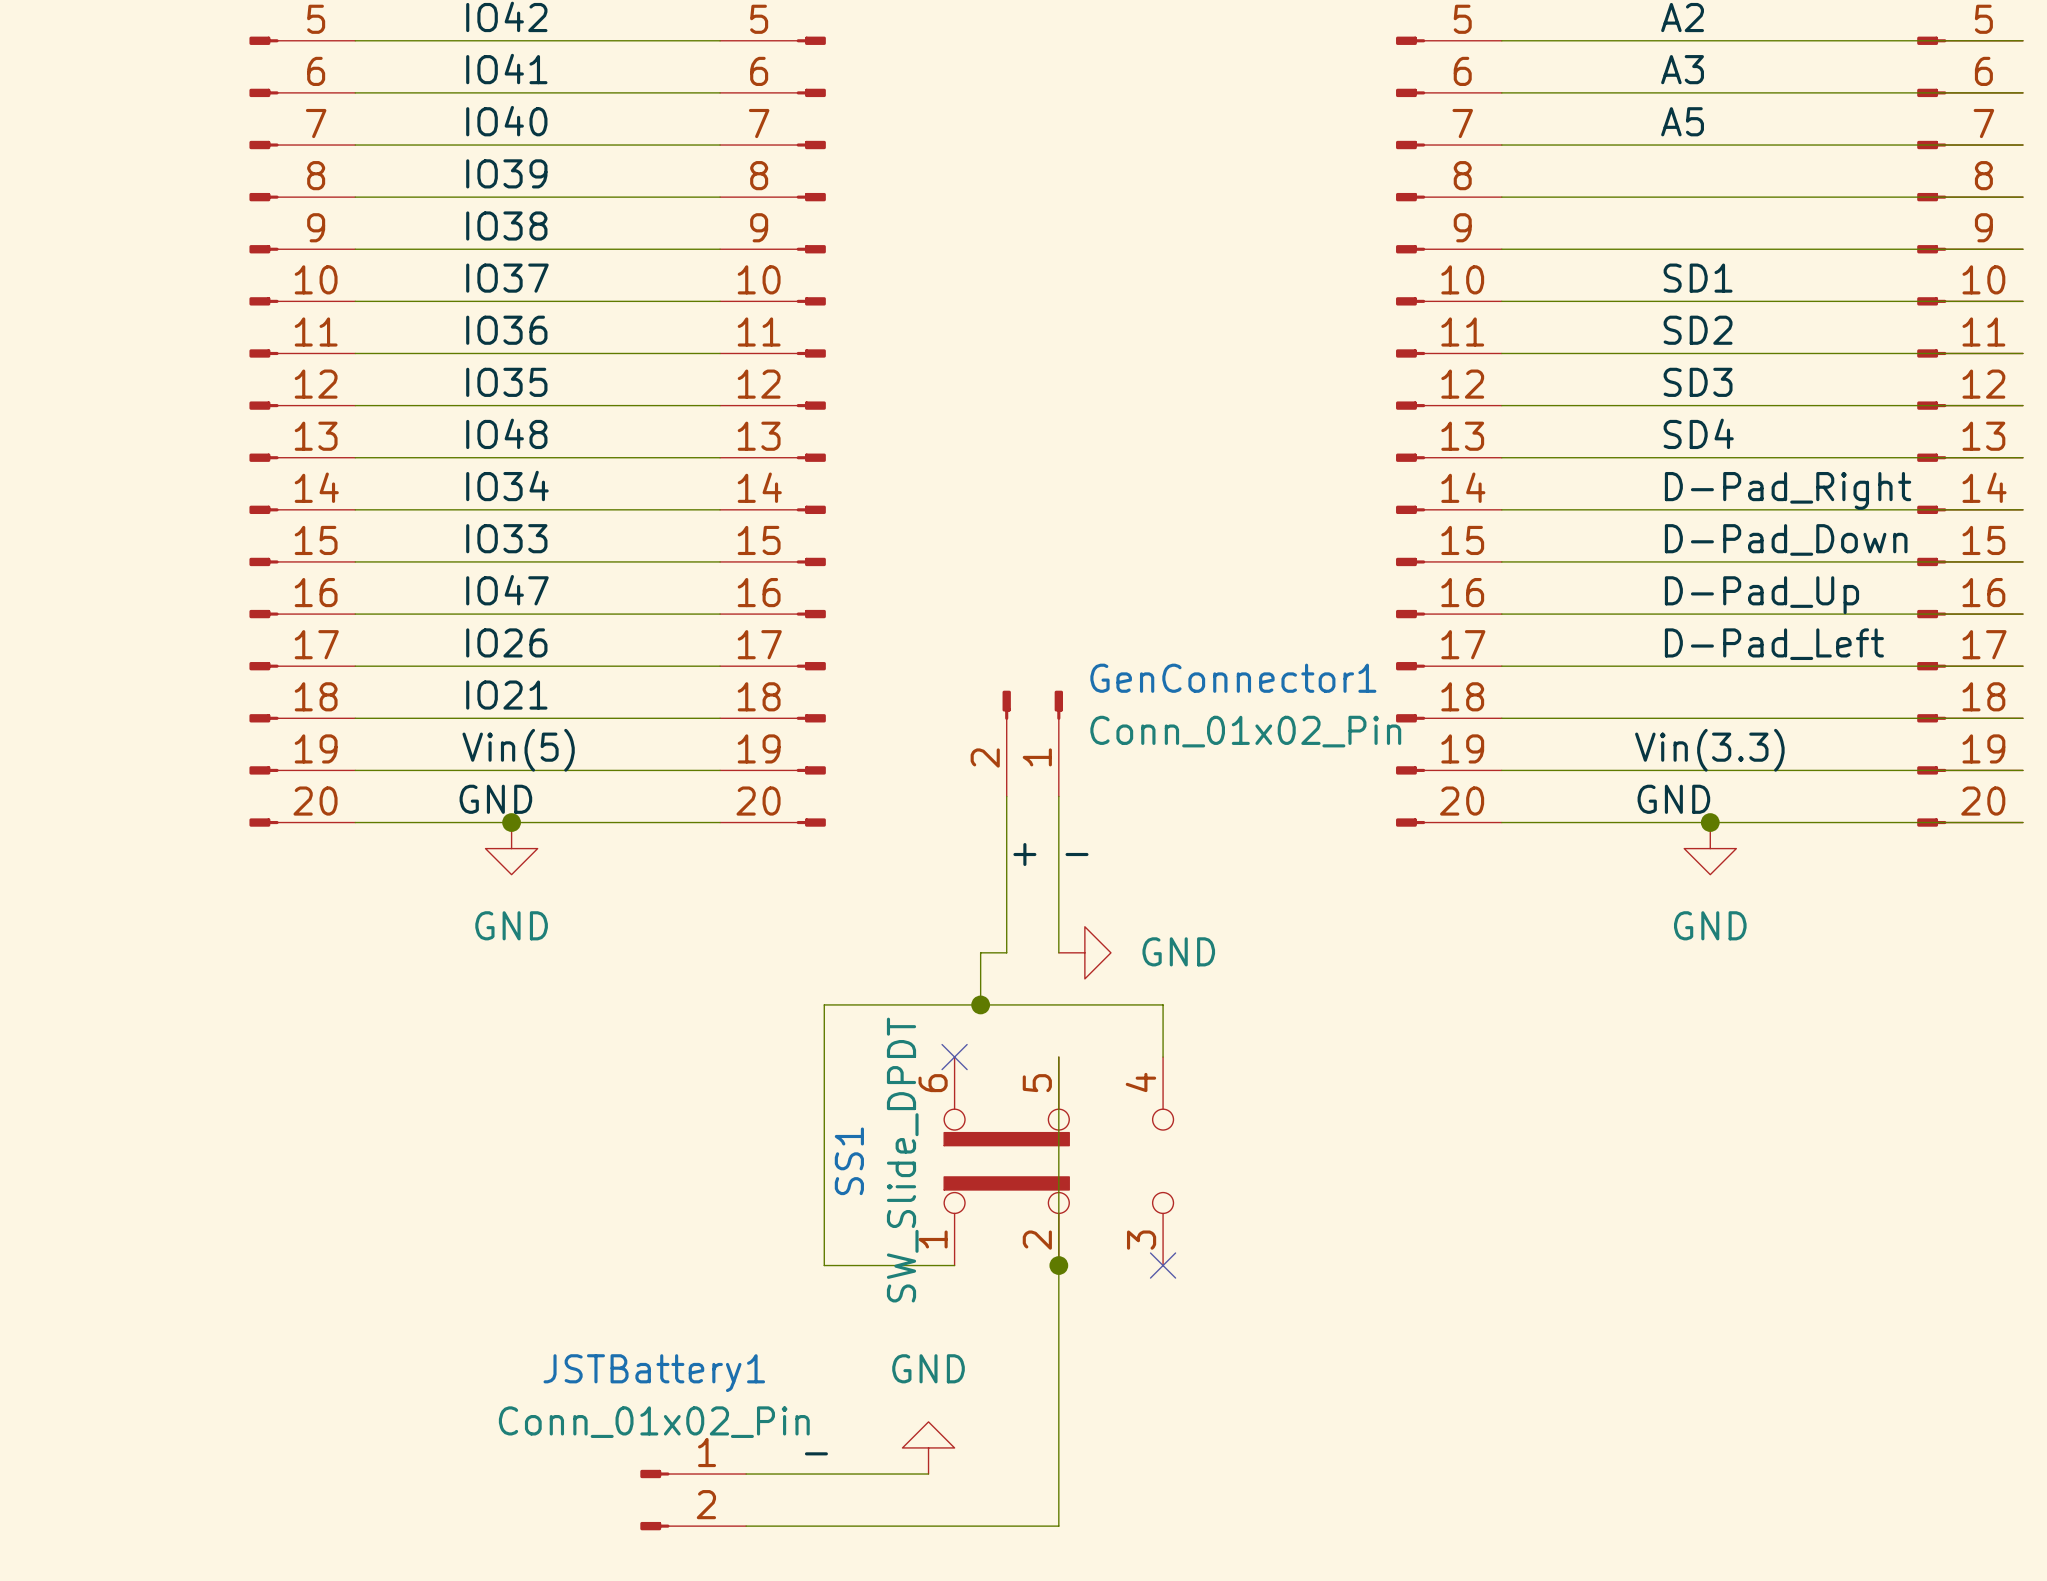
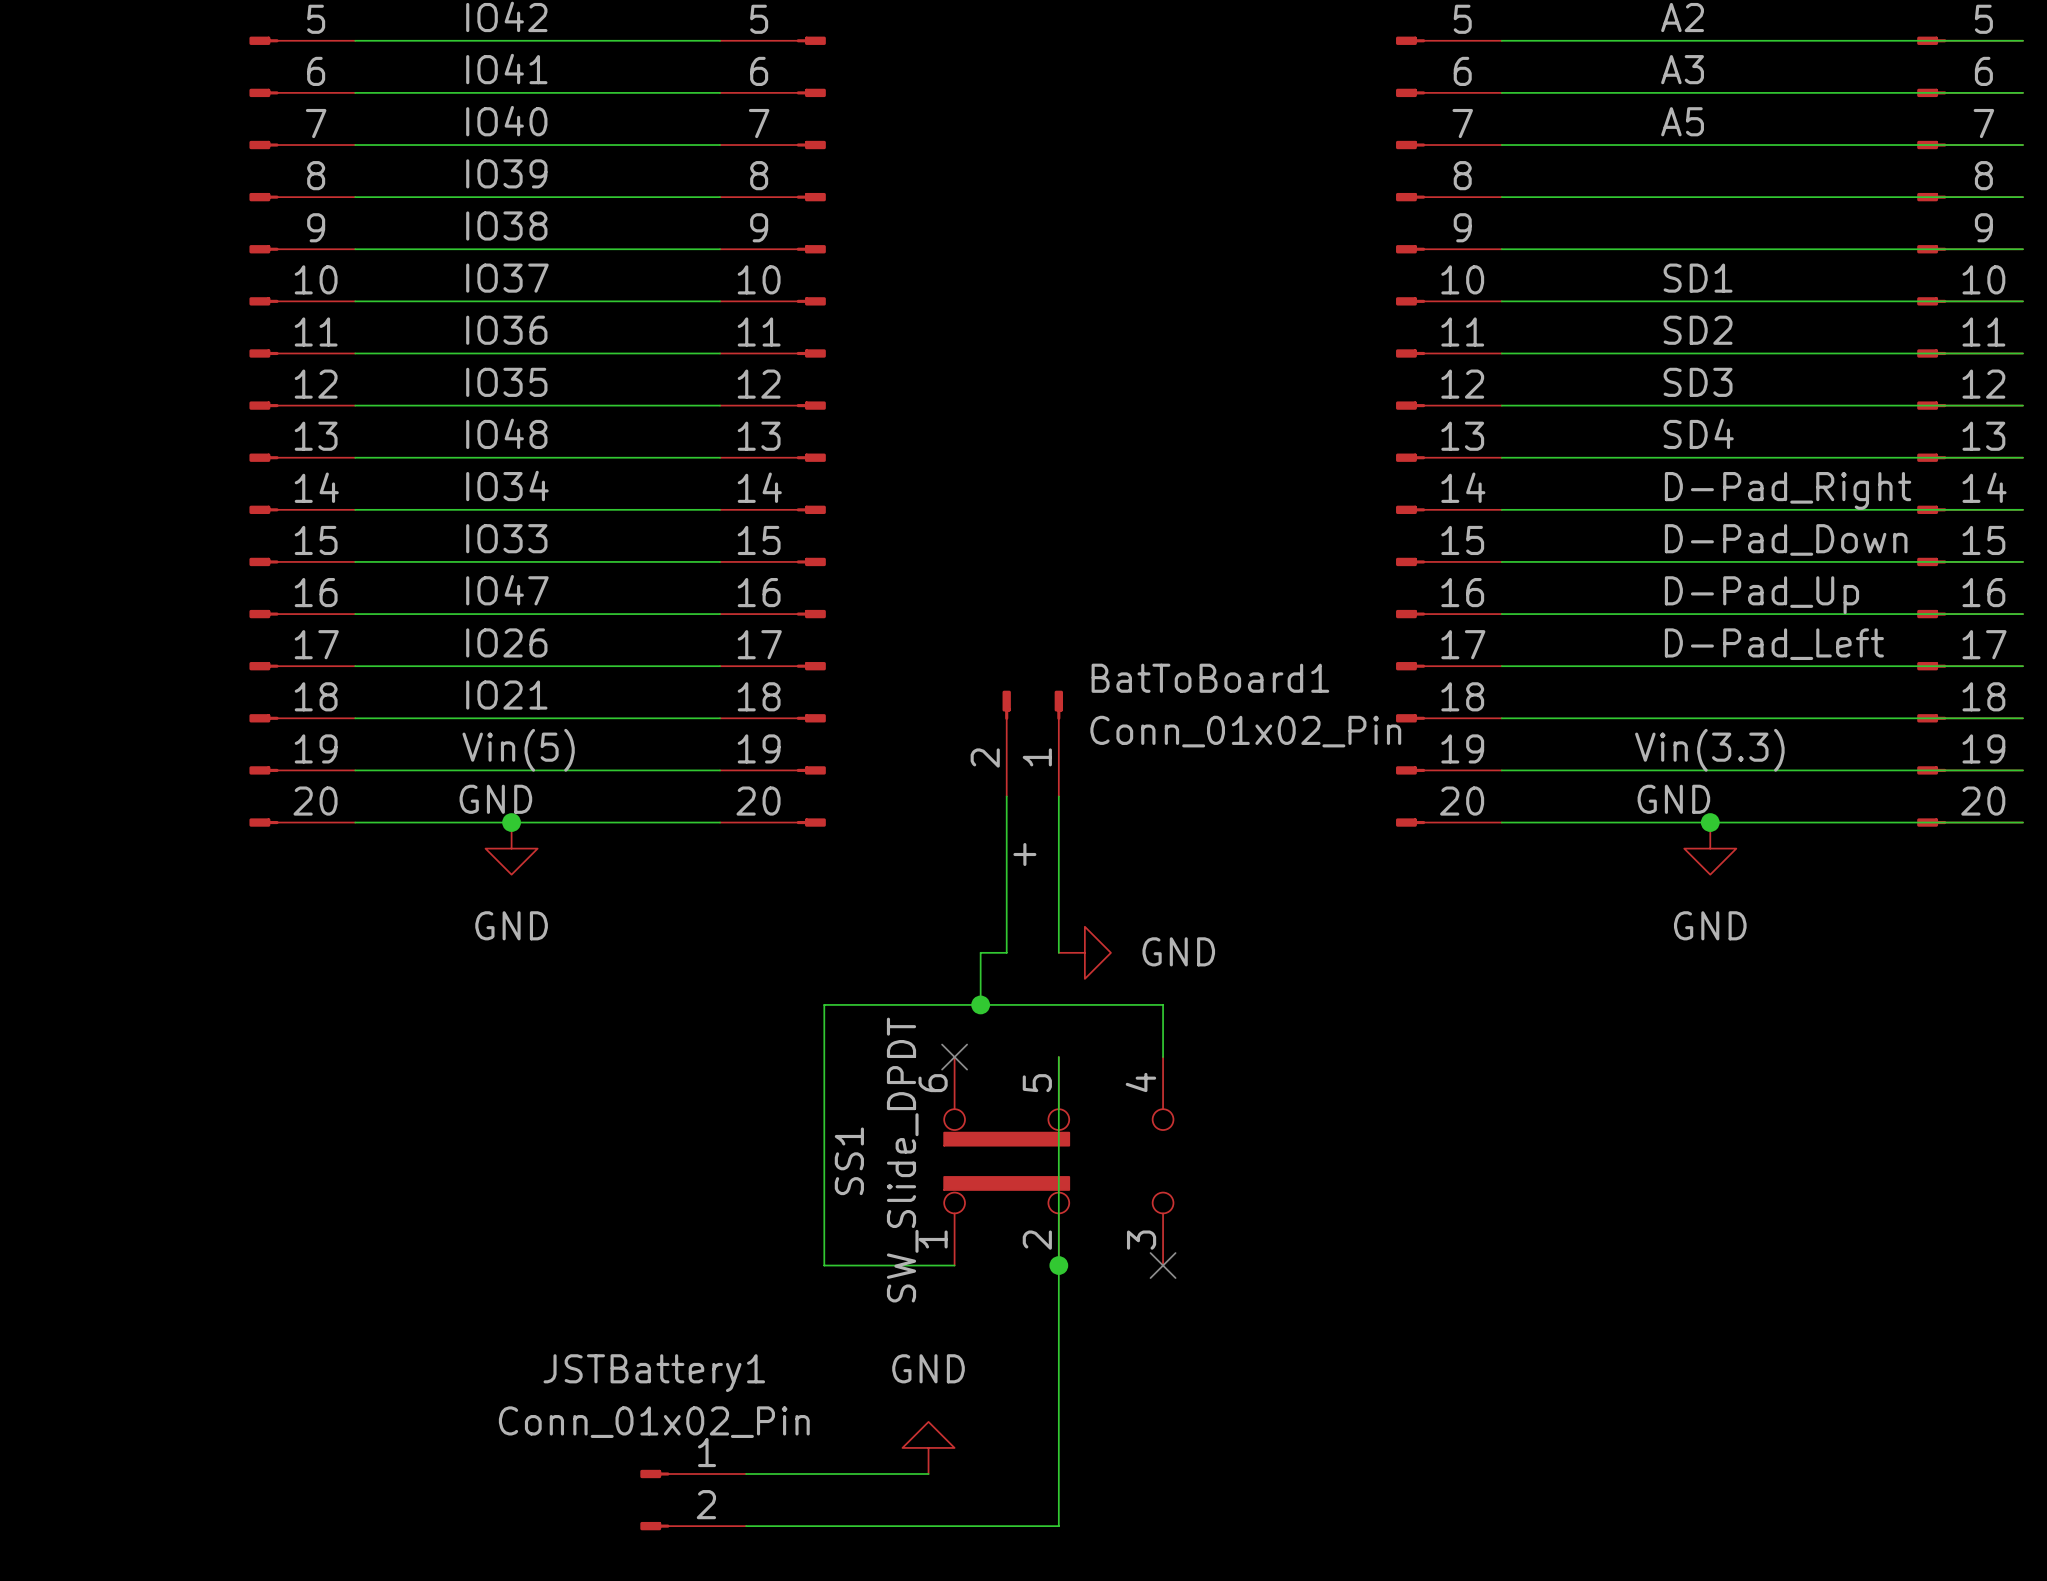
GenConnector1 name: GenConnector1 (1233, 678) -> BatToBoard1 (1210, 678)
label: - (1077, 854) -> none
label: - (816, 1453) -> none

